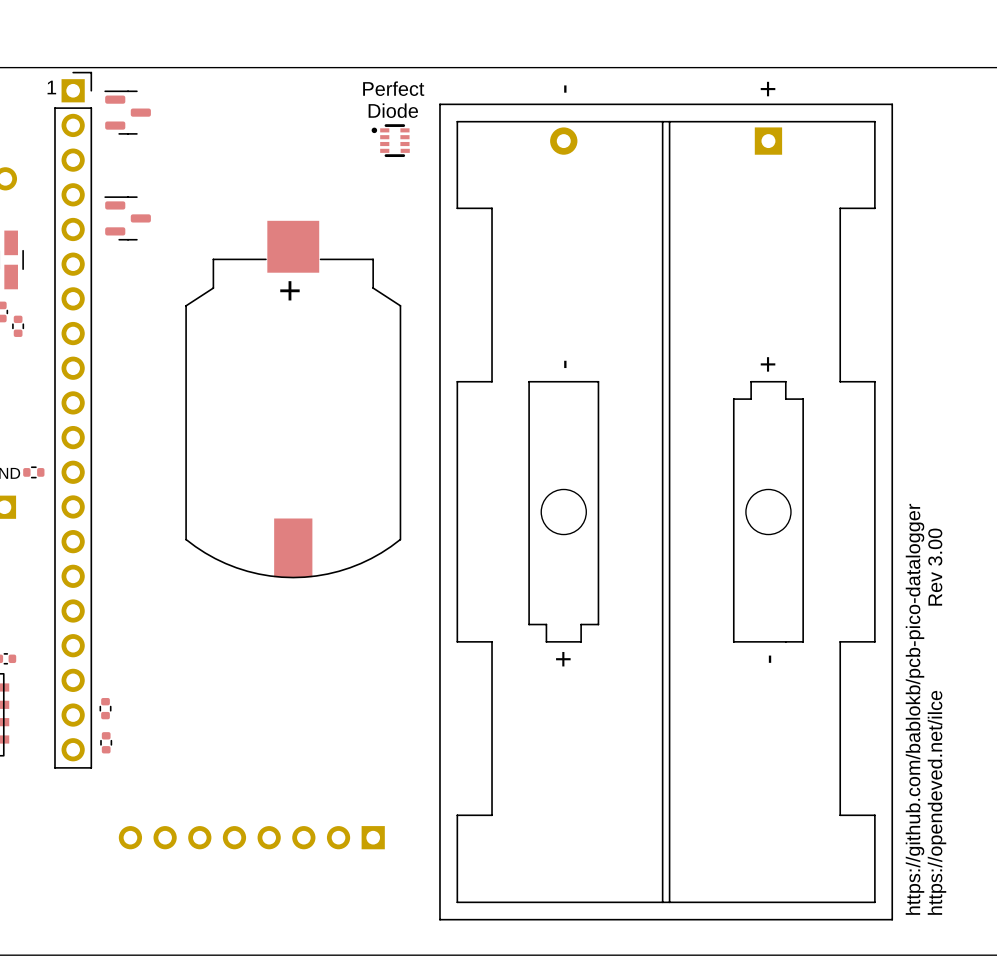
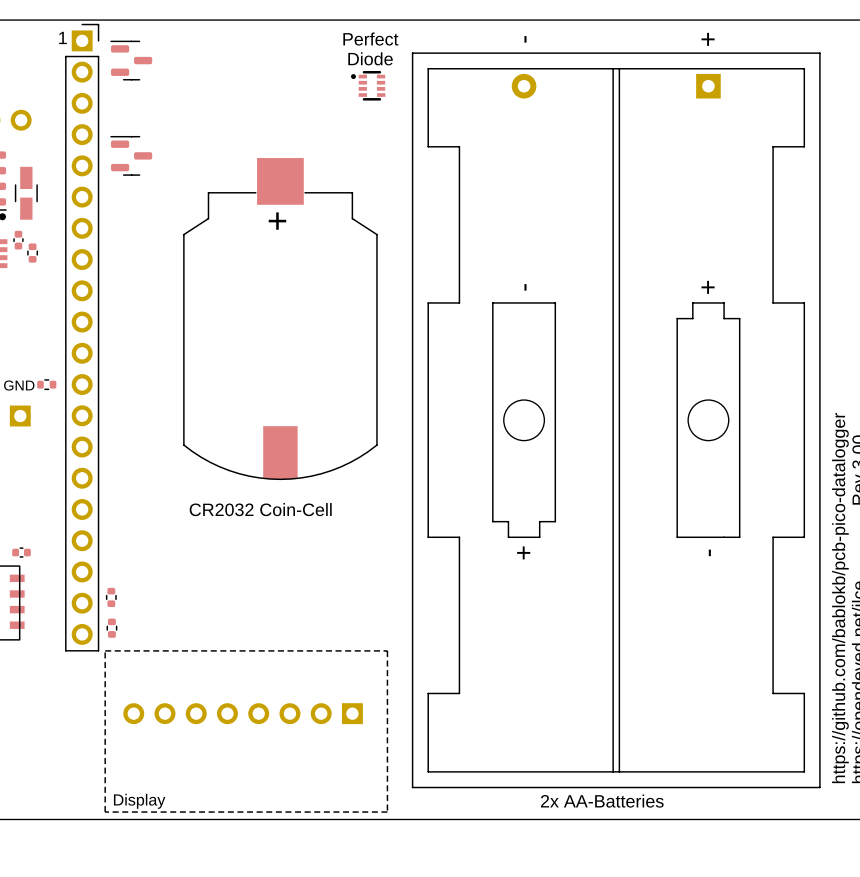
text: none -> CR2032 Coin-Cell (260, 509)
line: none -> (105, 650) (387, 650) (387, 812) (105, 812) (105, 650)
text: none -> 2x AA-Batteries (602, 801)
text: none -> Display (139, 801)

